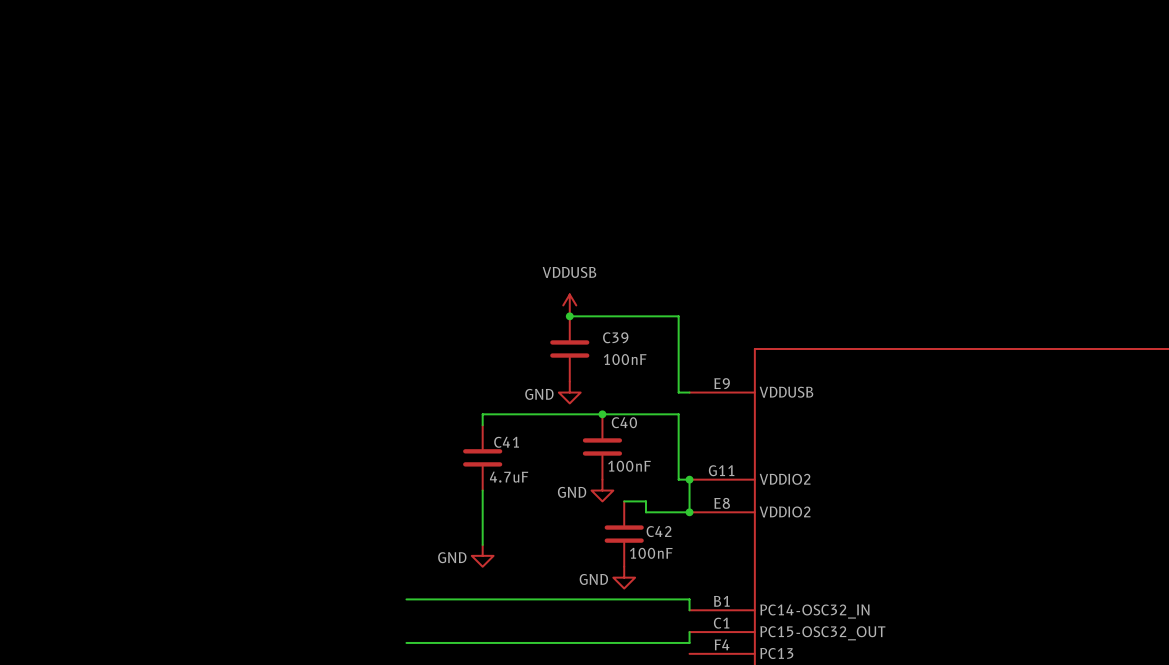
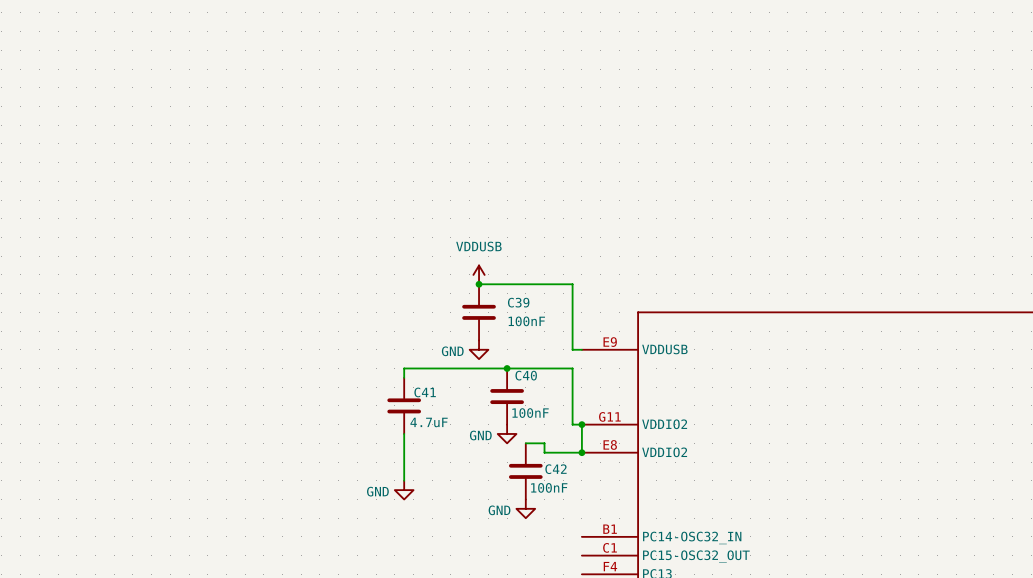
wire: (406, 599) (689, 599) (689, 610) -> none
wire: (689, 632) (689, 642) (406, 642) -> none

